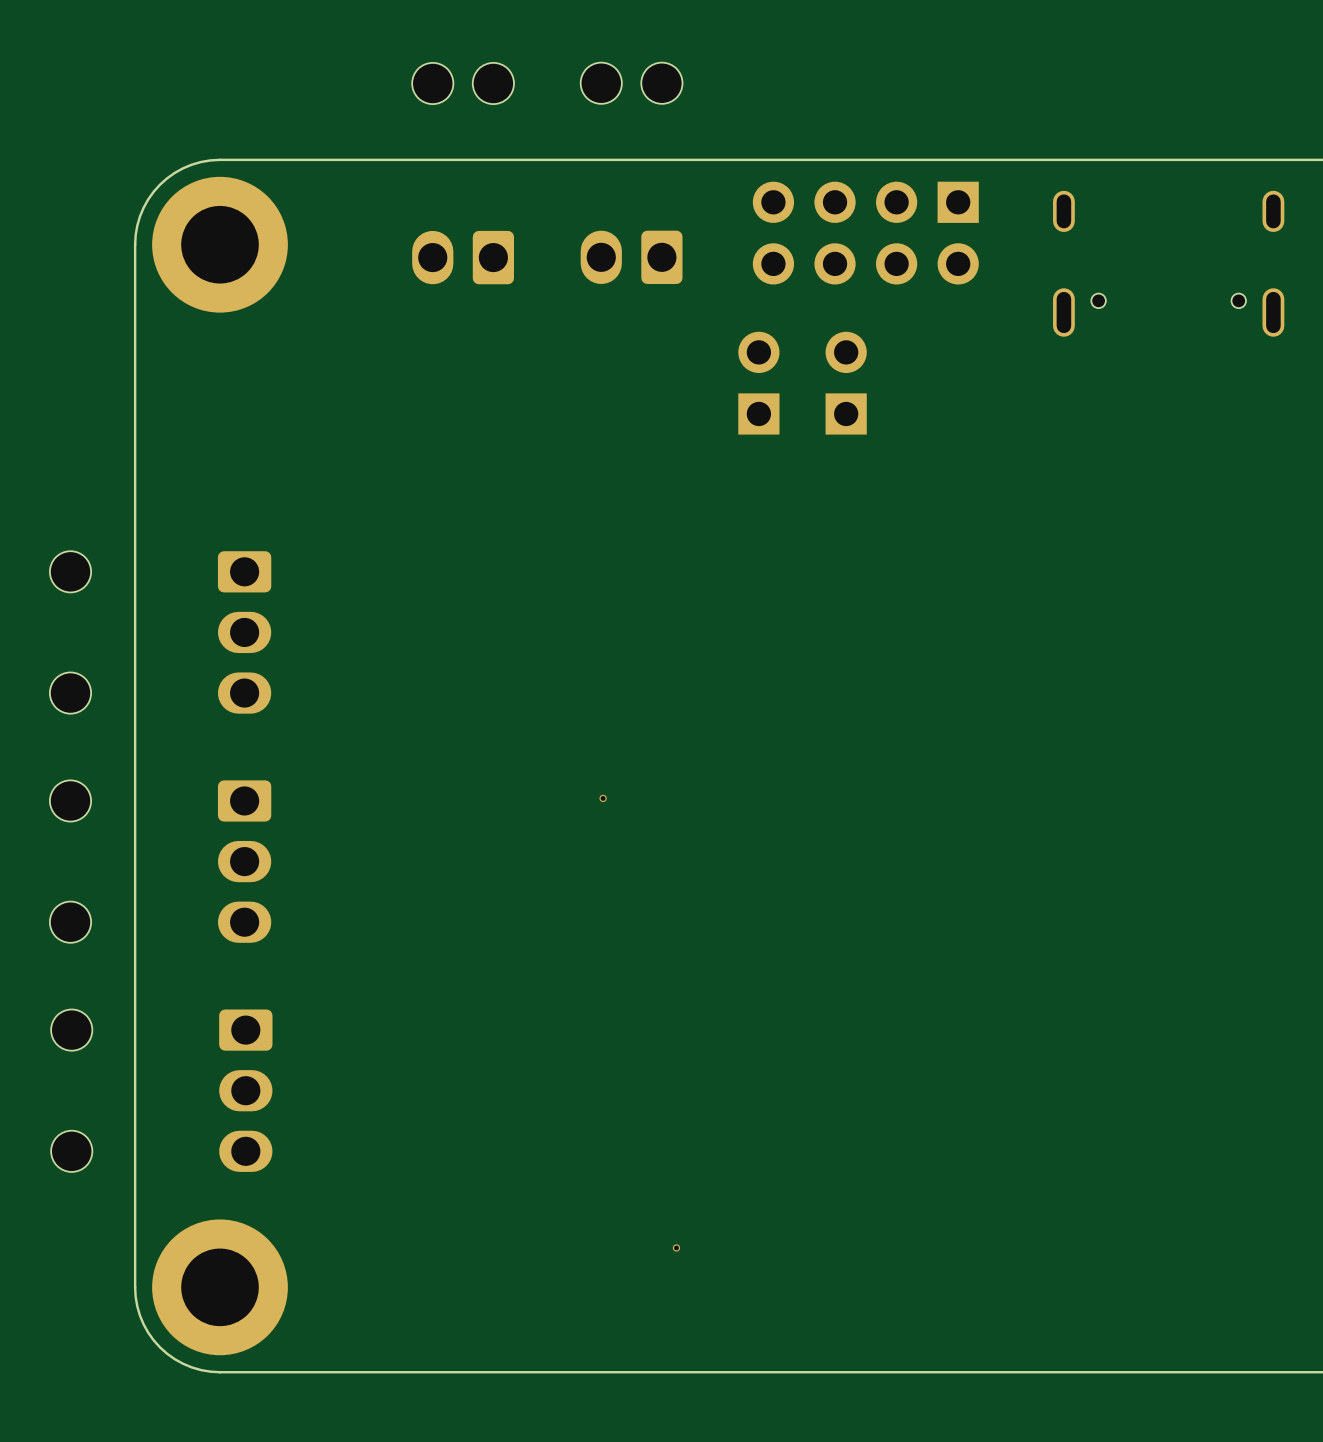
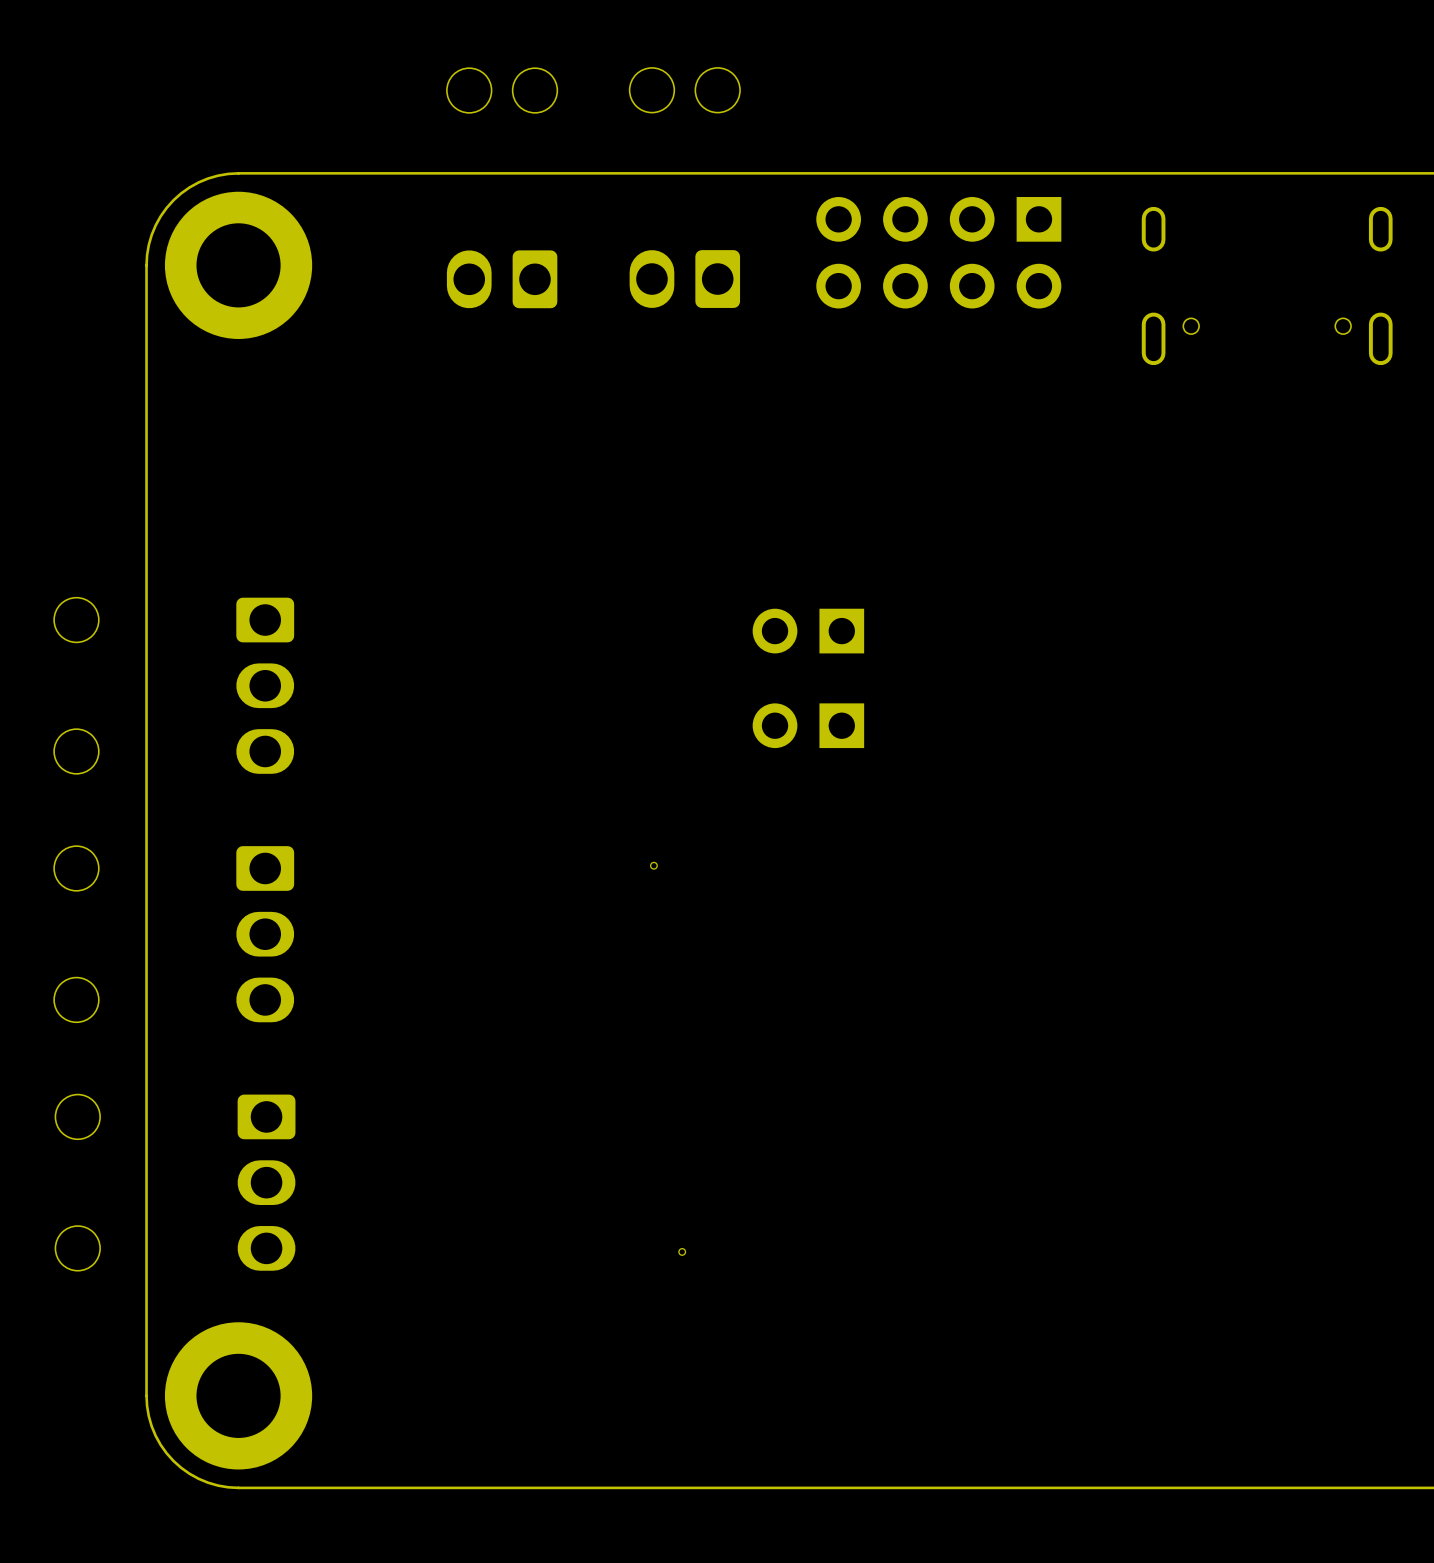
part: (758, 383) -> none
part: (846, 383) -> none
part: none -> (808, 631)
part: none -> (808, 725)
part position: (676, 1247) -> (682, 1251)

